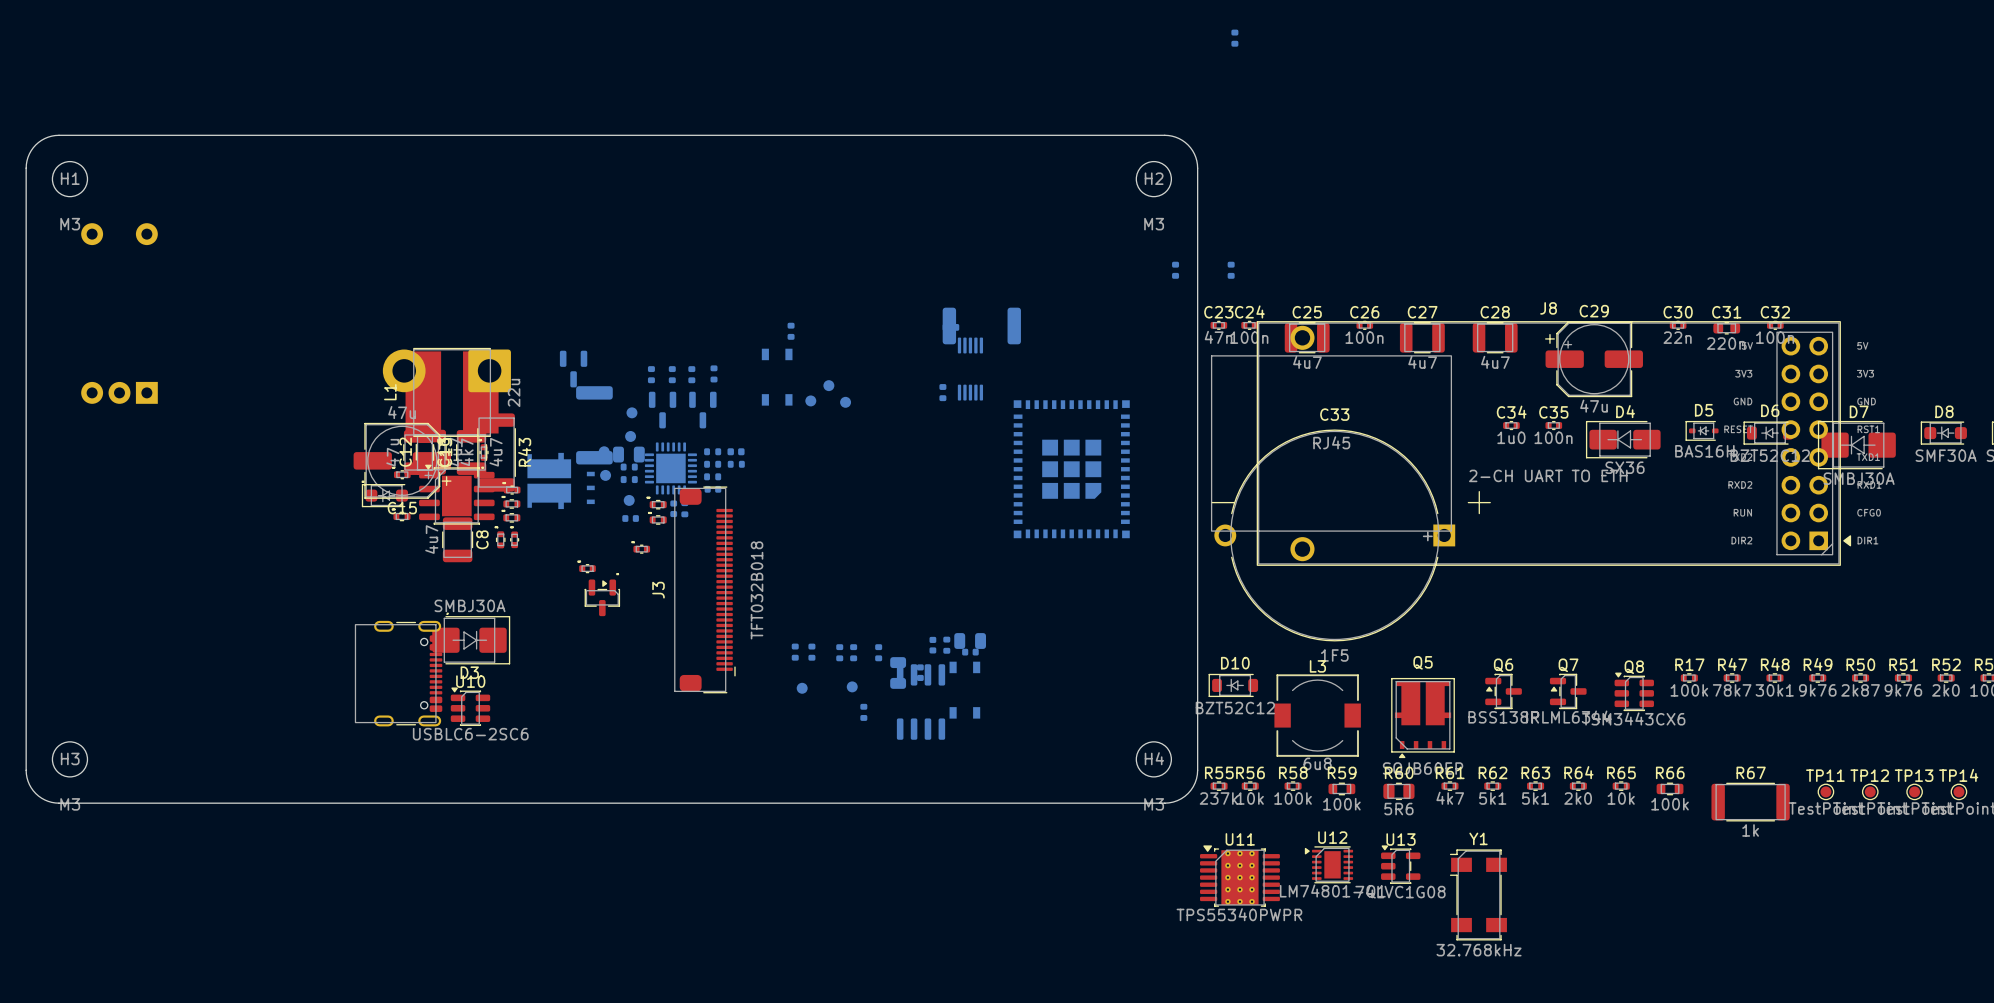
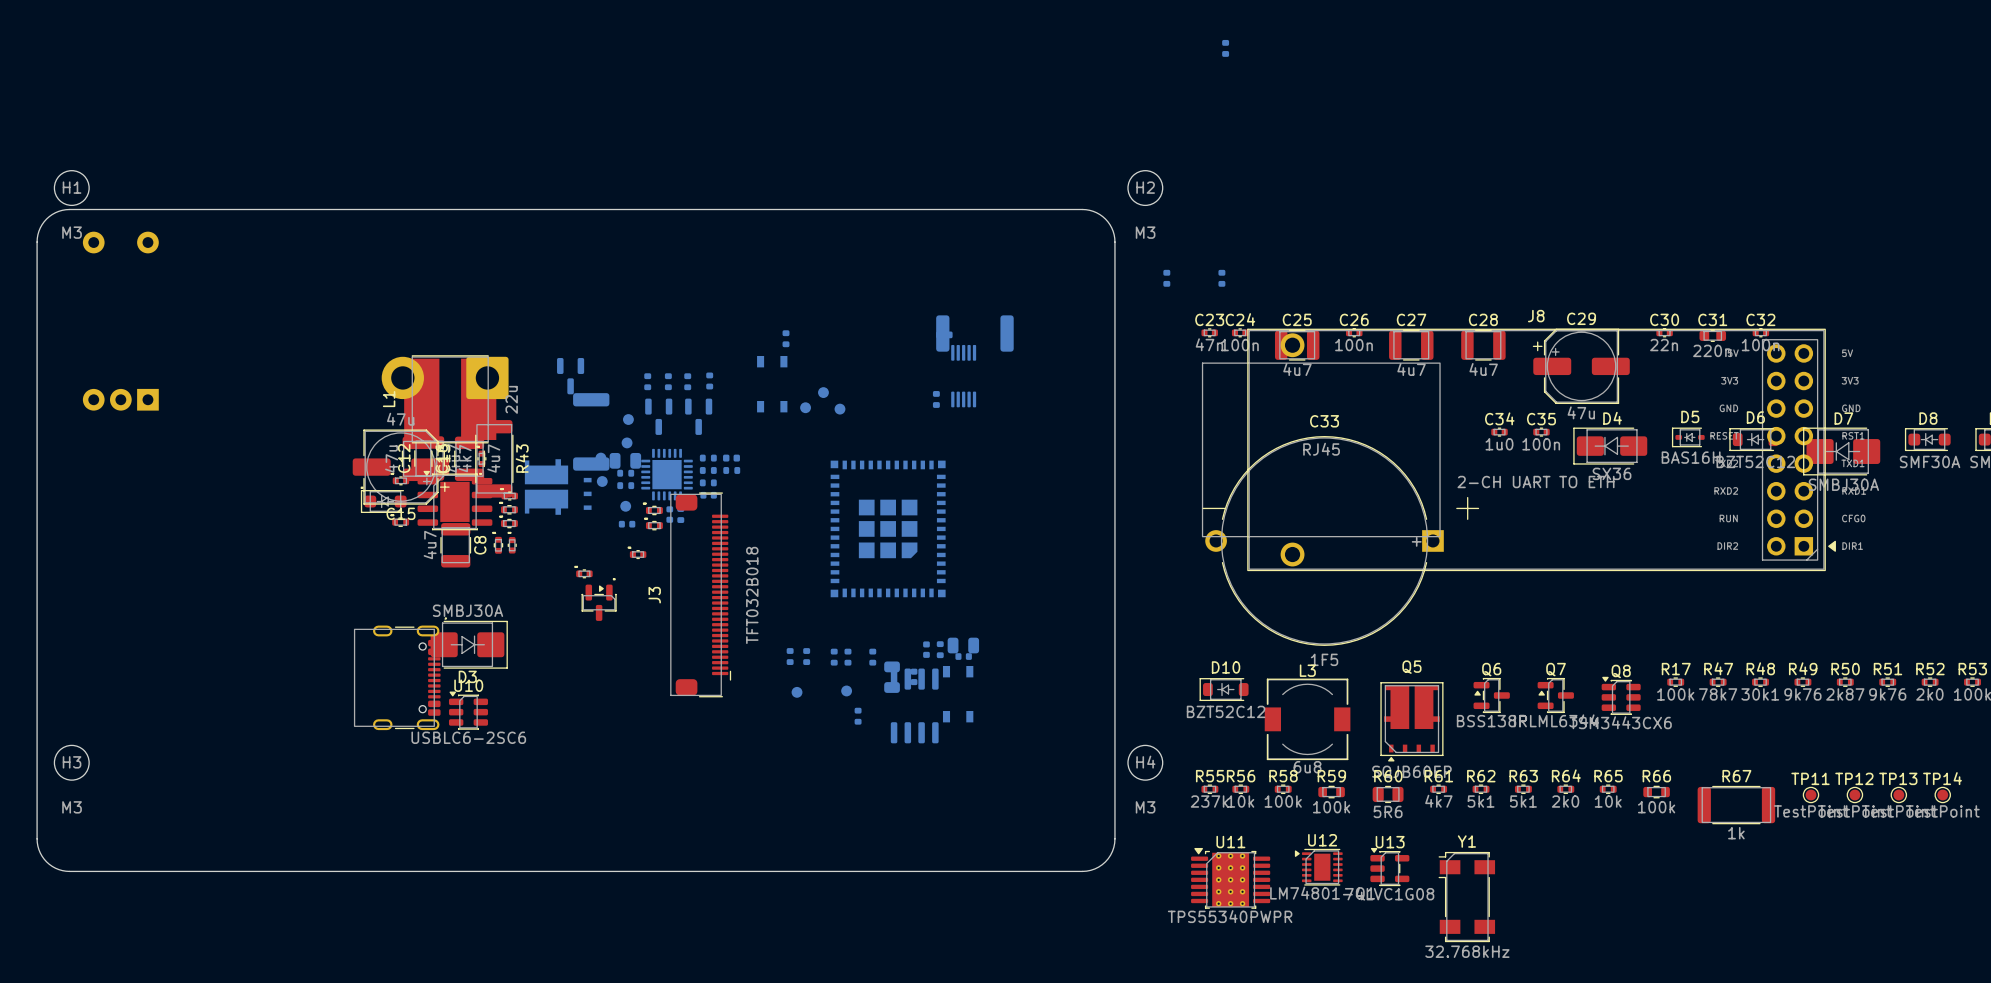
board edge: (59, 135) (1164, 135) (1182, 140) (1192, 150) (1197, 168) (1197, 770) (1193, 786) (1181, 798) (1164, 803) (59, 803) (41, 798) (31, 787) (26, 770) (26, 168) (28, 157) (35, 144) (48, 137) (59, 135) -> (69, 209) (58, 211) (46, 219) (38, 231) (37, 242) (37, 838) (42, 856) (52, 866) (69, 871) (1082, 871) (1098, 867) (1110, 855) (1114, 838) (1114, 242) (1109, 224) (1099, 214) (1082, 209) (69, 209)
part position: (1071, 469) -> (888, 528)

